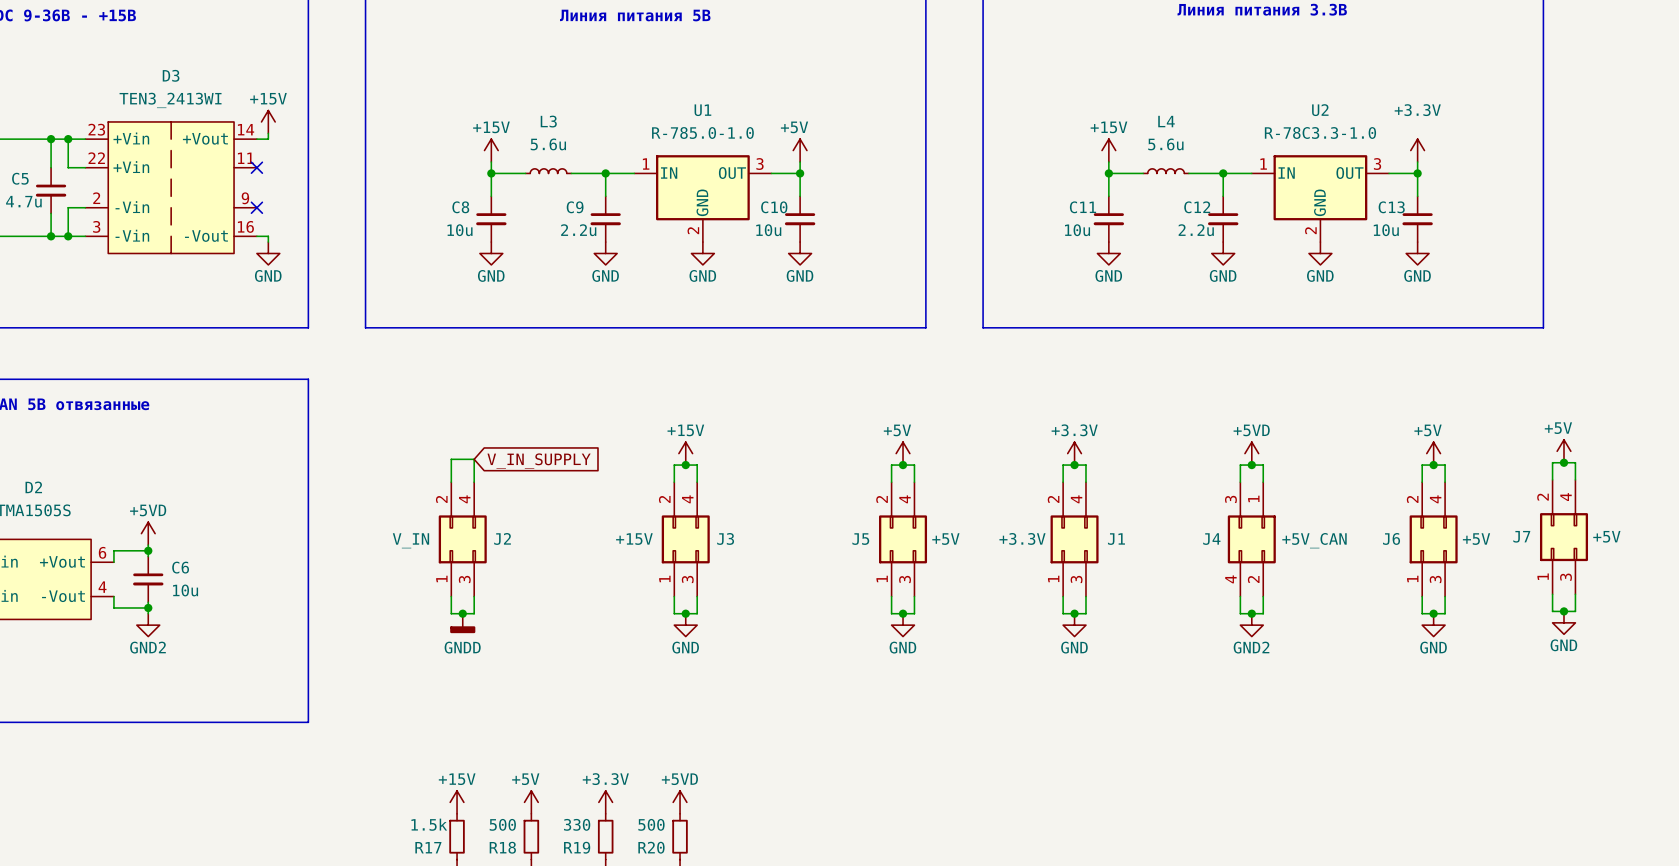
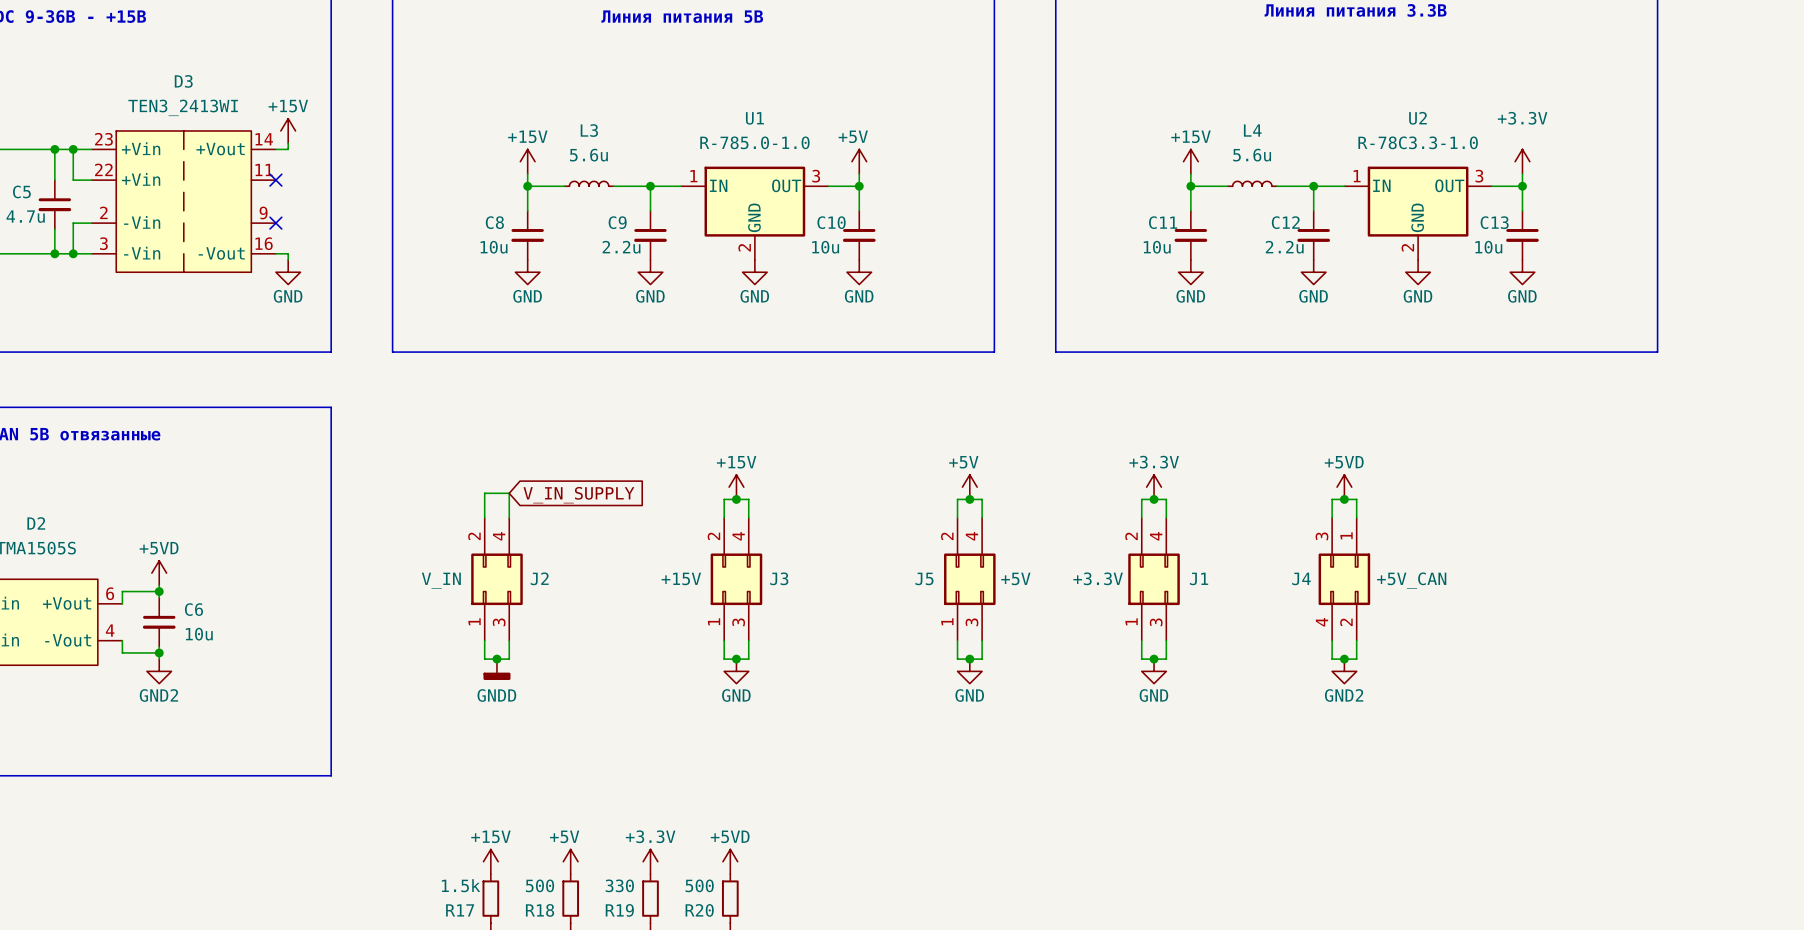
power symbol: +5V (1563, 451) -> none
power symbol: +5V (1433, 453) -> none
junction: (1563, 462) -> none
junction: (1433, 465) -> none
wire: (1552, 479) (1552, 462) (1575, 462) (1575, 479) -> none
wire: (1422, 482) (1422, 465) (1445, 465) (1445, 482) -> none
J7: +5V (1563, 537) -> none
J6: +5V (1433, 539) -> none
wire: (1552, 594) (1552, 611) (1575, 611) (1575, 594) -> none
wire: (1422, 596) (1422, 613) (1445, 613) (1445, 596) -> none
junction: (1563, 611) -> none
junction: (1433, 613) -> none
power symbol: GND (1563, 622) -> none
power symbol: GND (1433, 625) -> none

